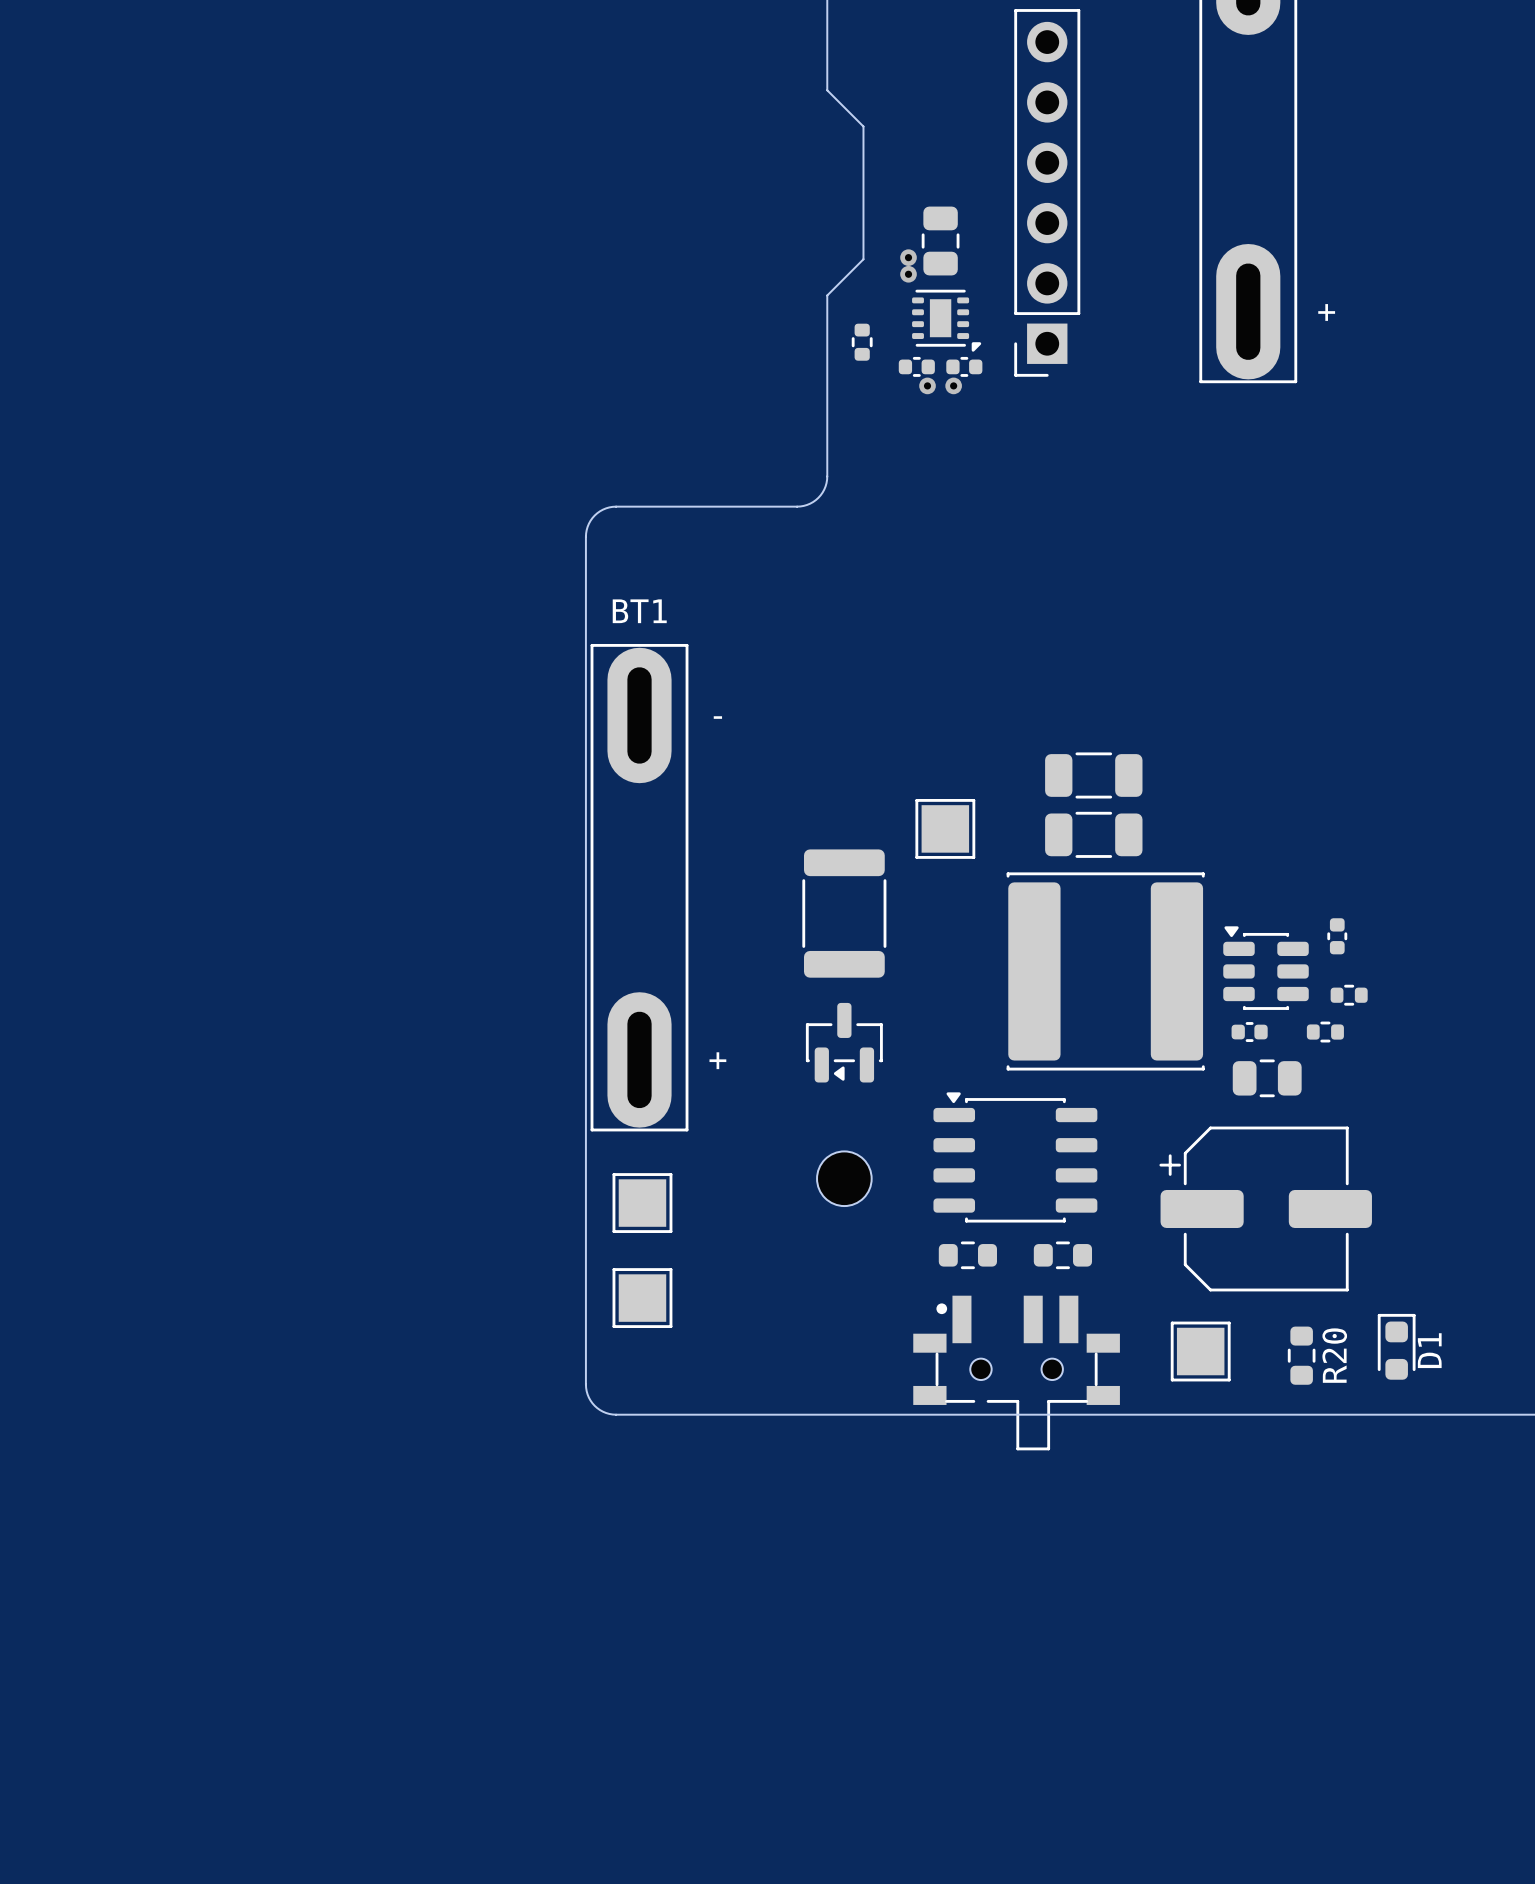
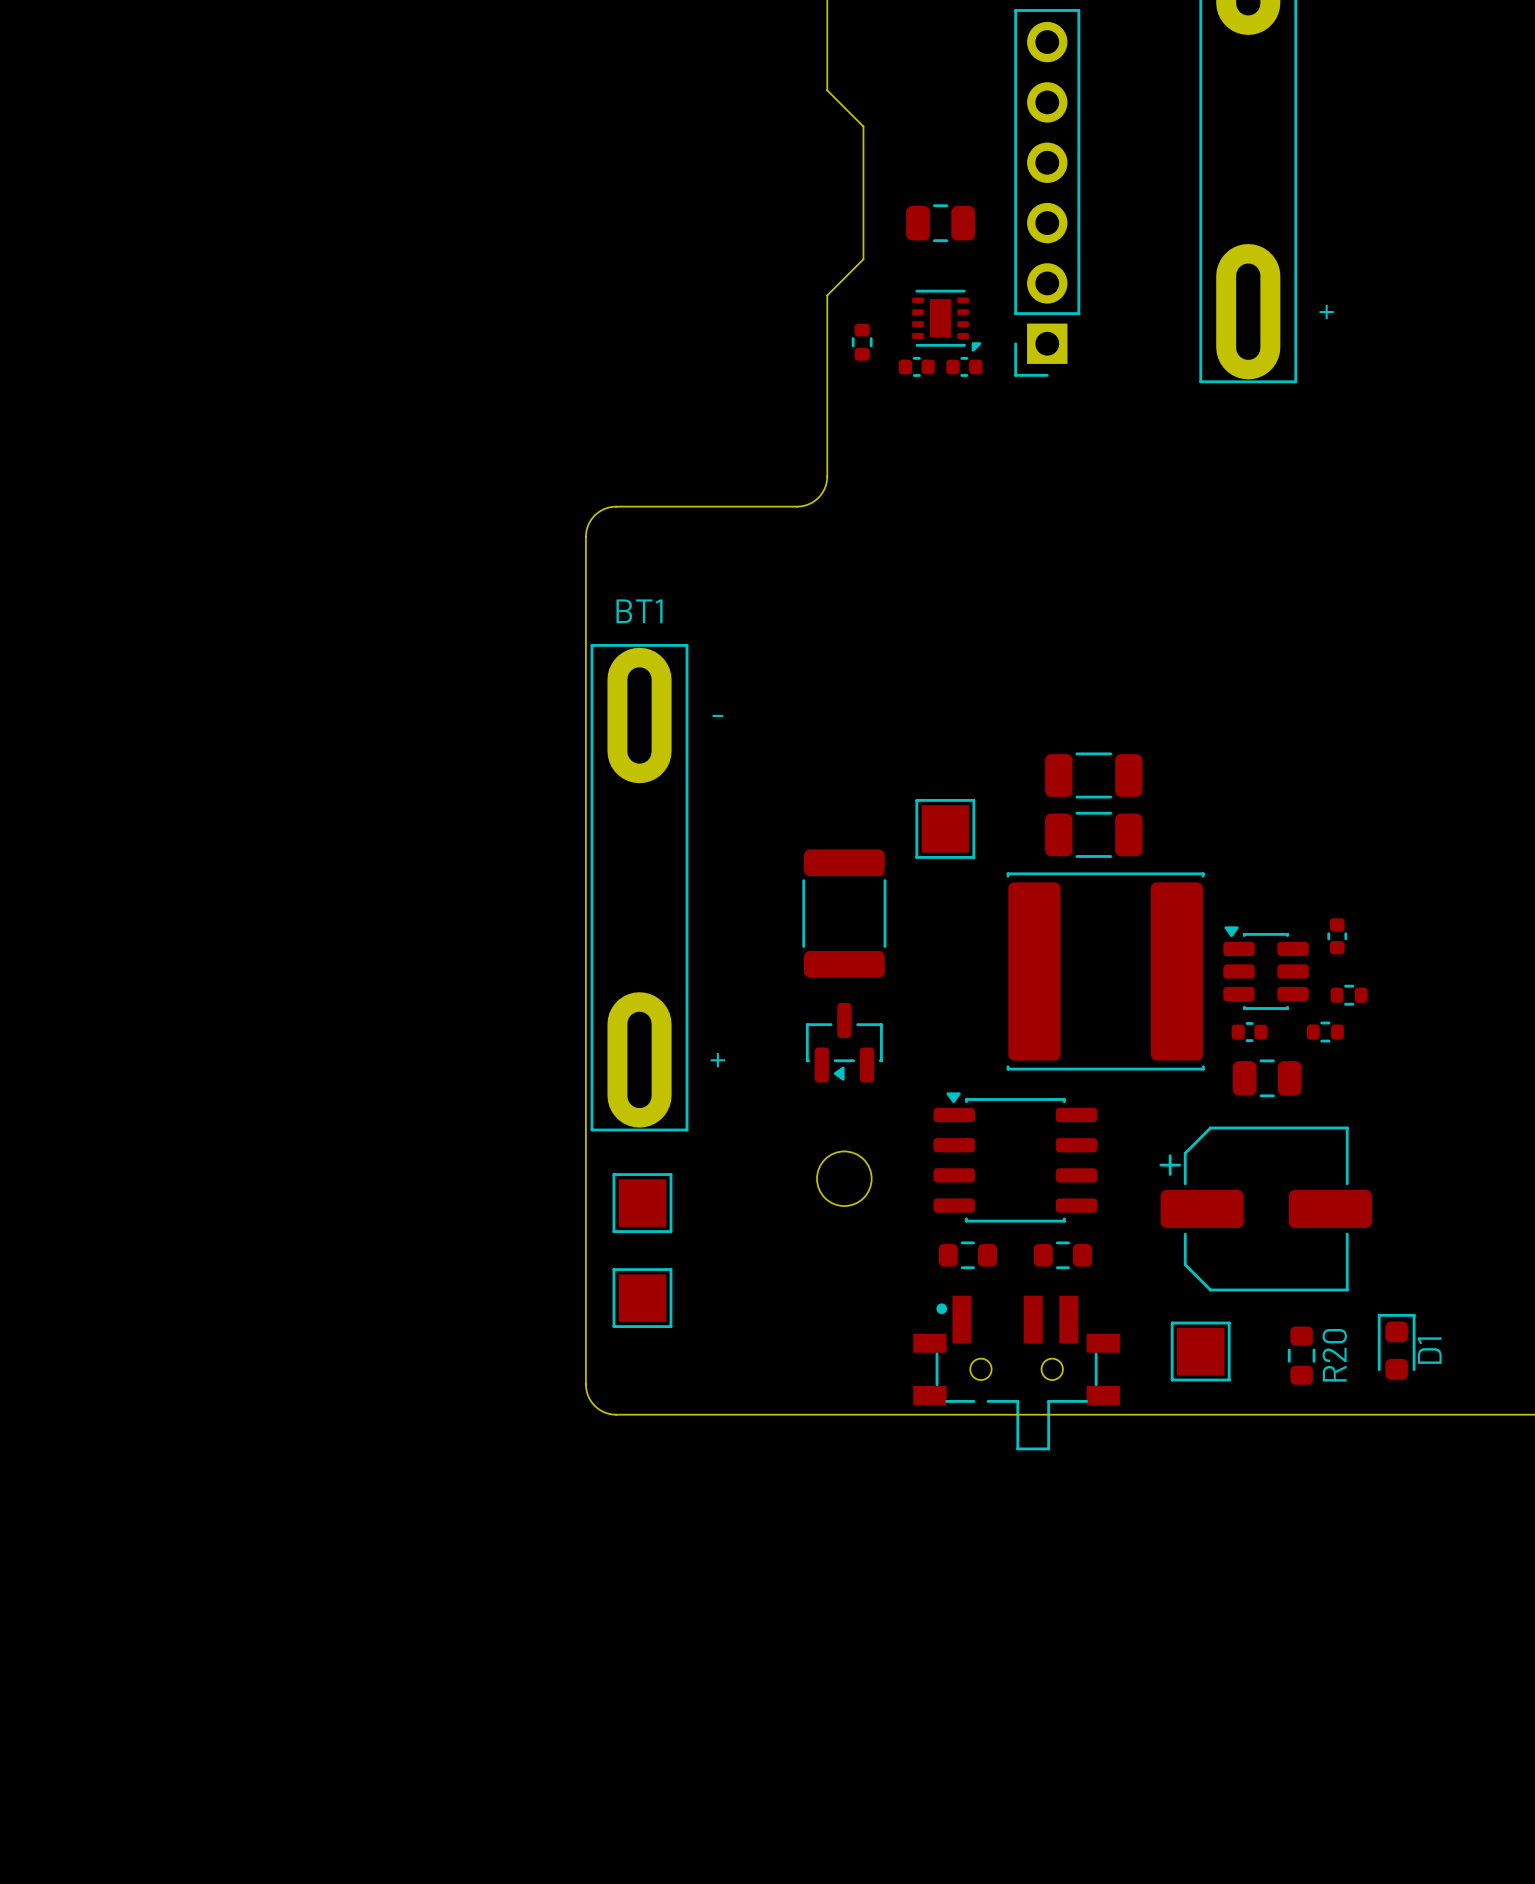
part rotation: 0° (940, 241) -> 90° clockwise (940, 223)
via: (908, 257) -> none
via: (908, 274) -> none
via: (927, 385) -> none
via: (953, 385) -> none

